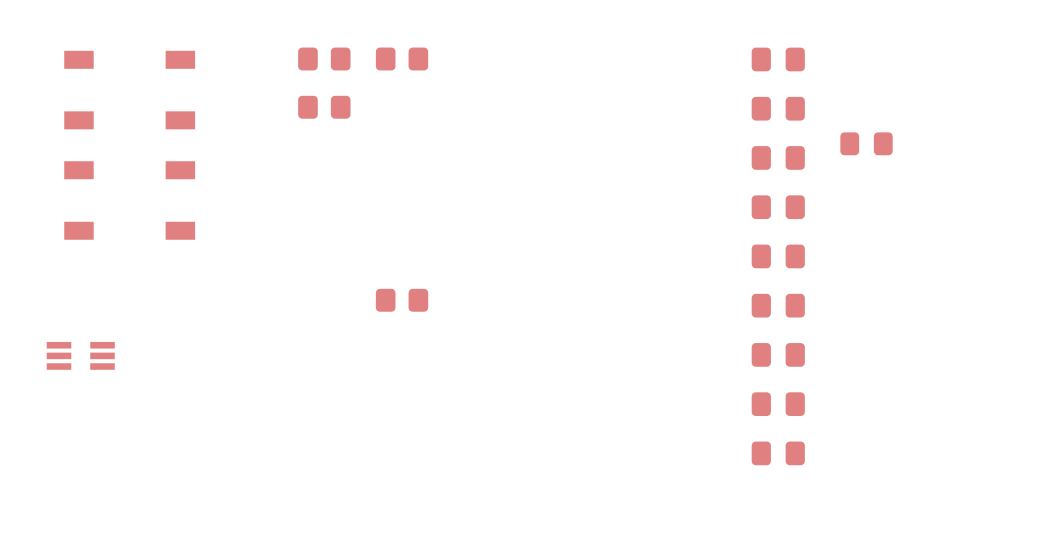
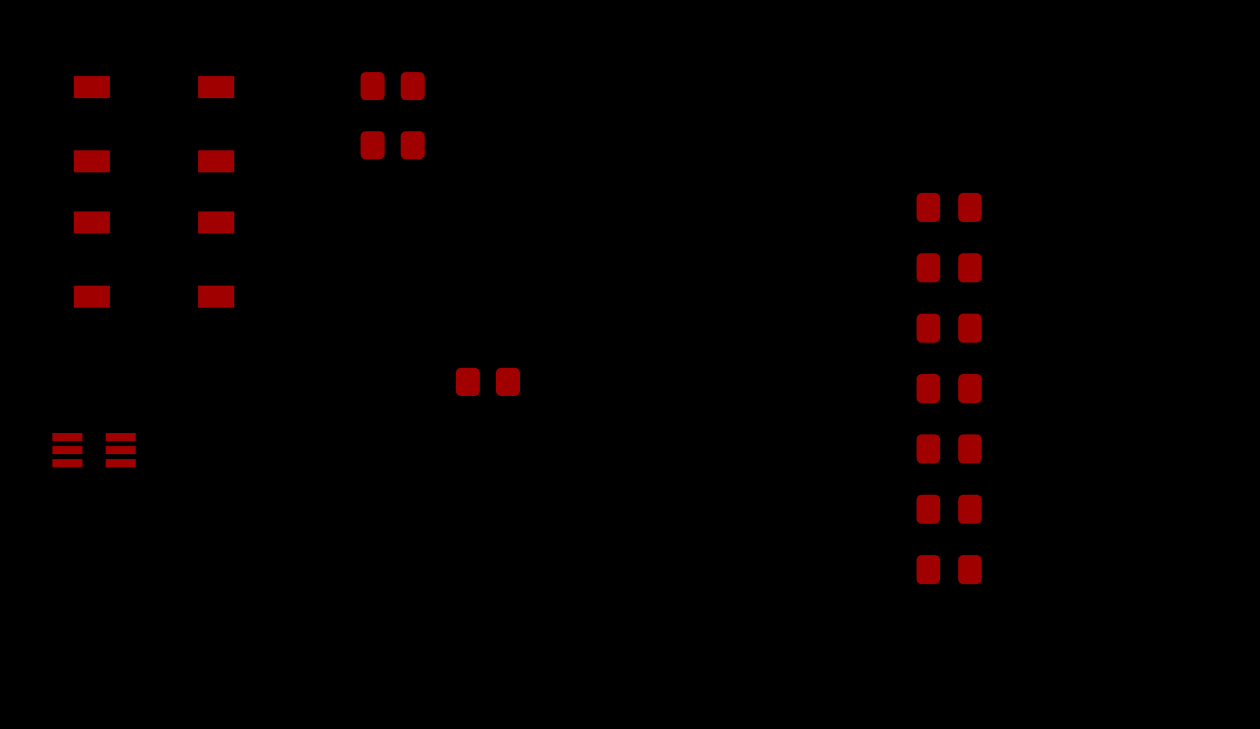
part: (402, 59) -> none
part: (778, 59) -> none
part: (778, 108) -> none
part: (866, 143) -> none

